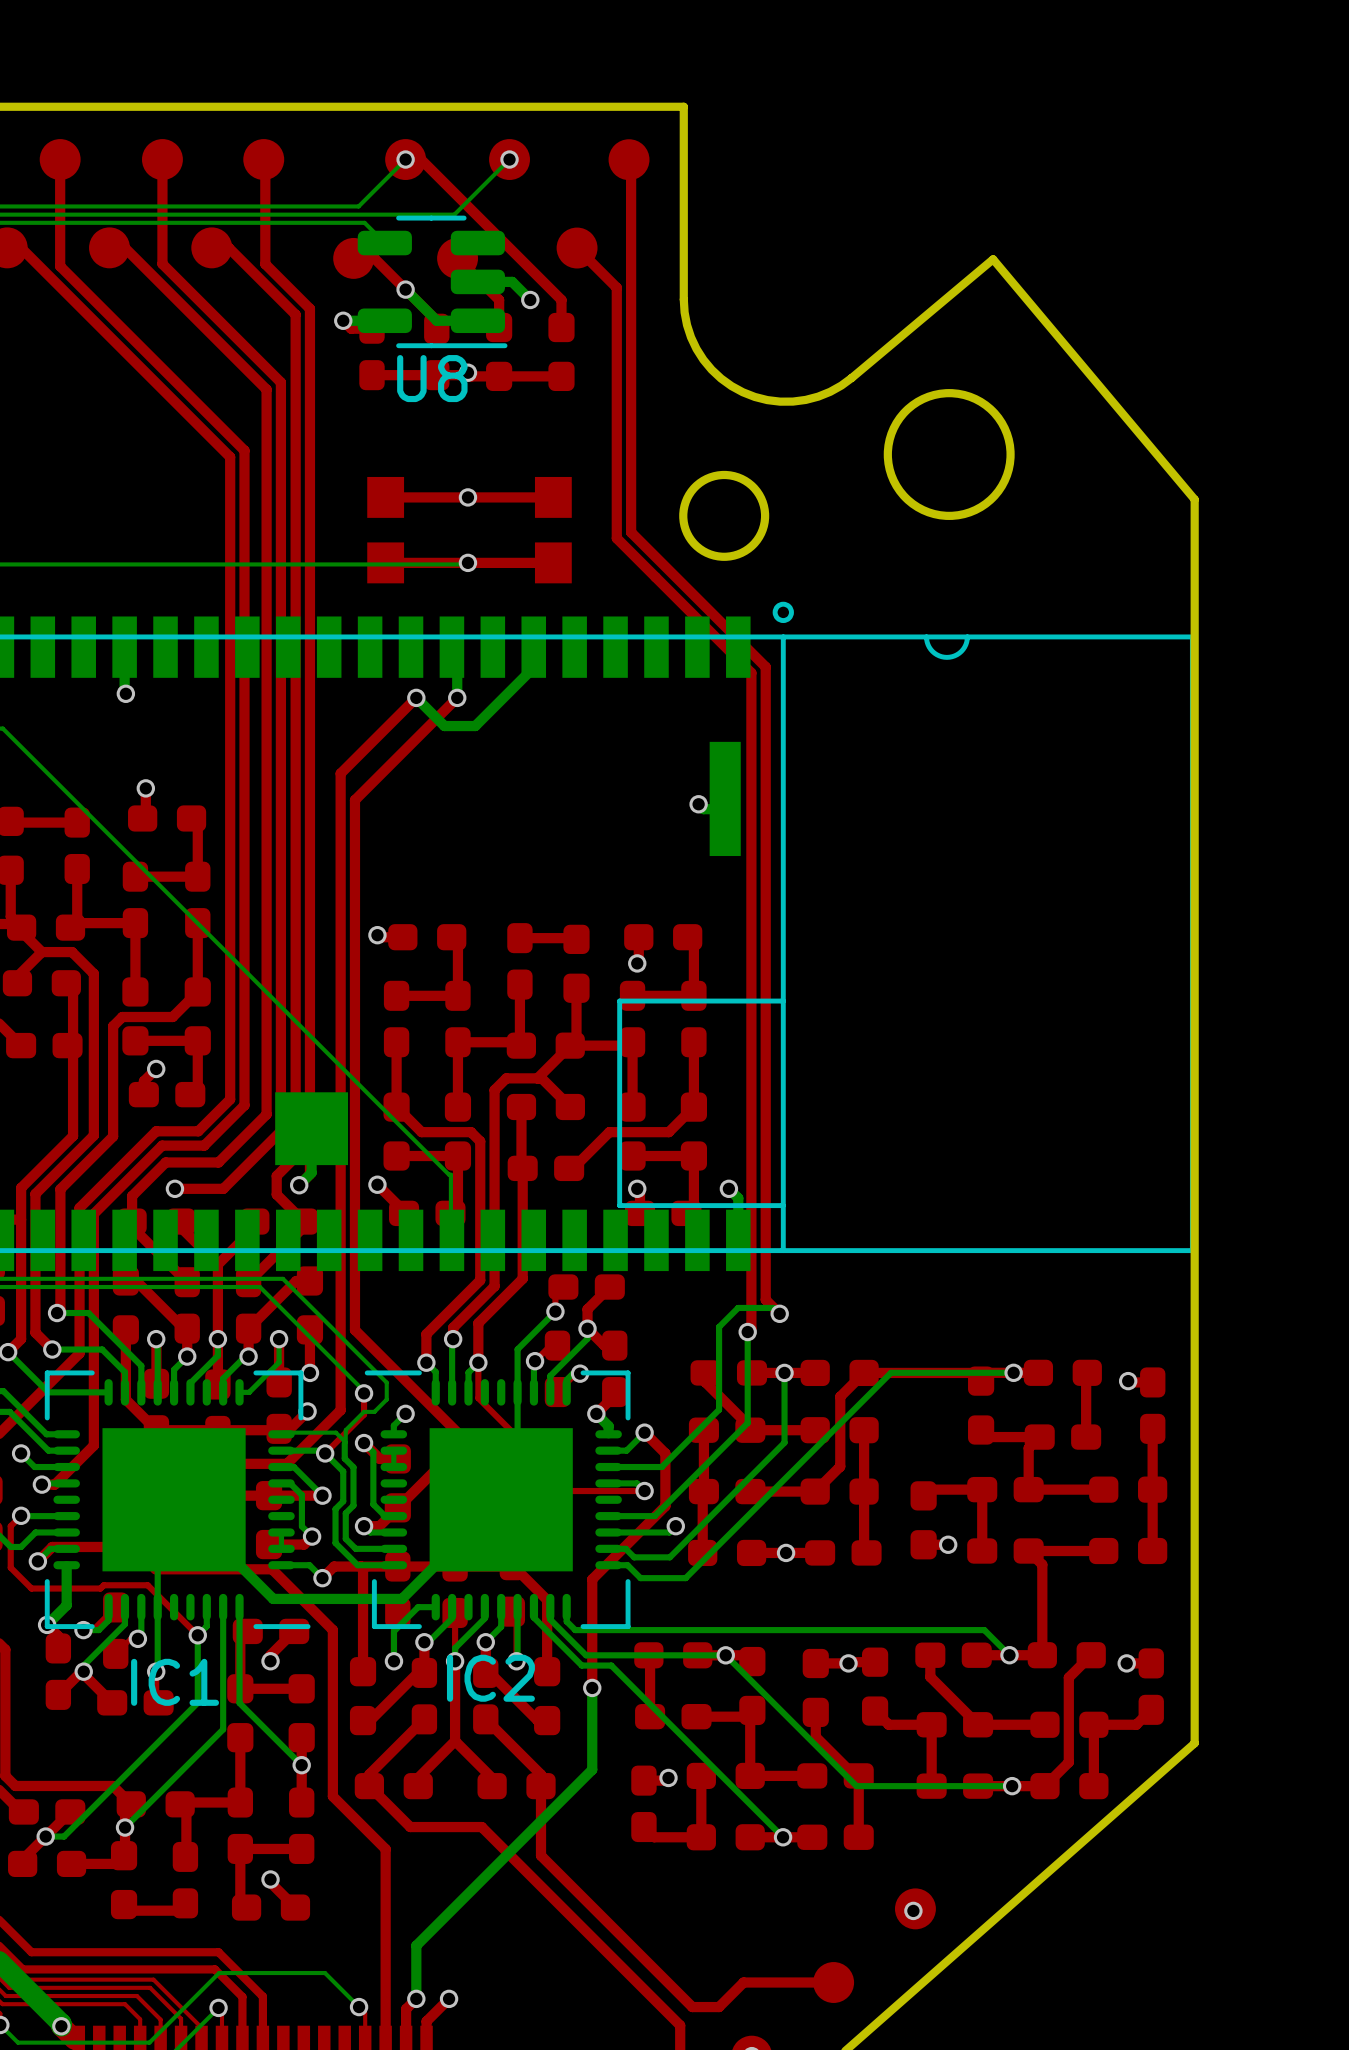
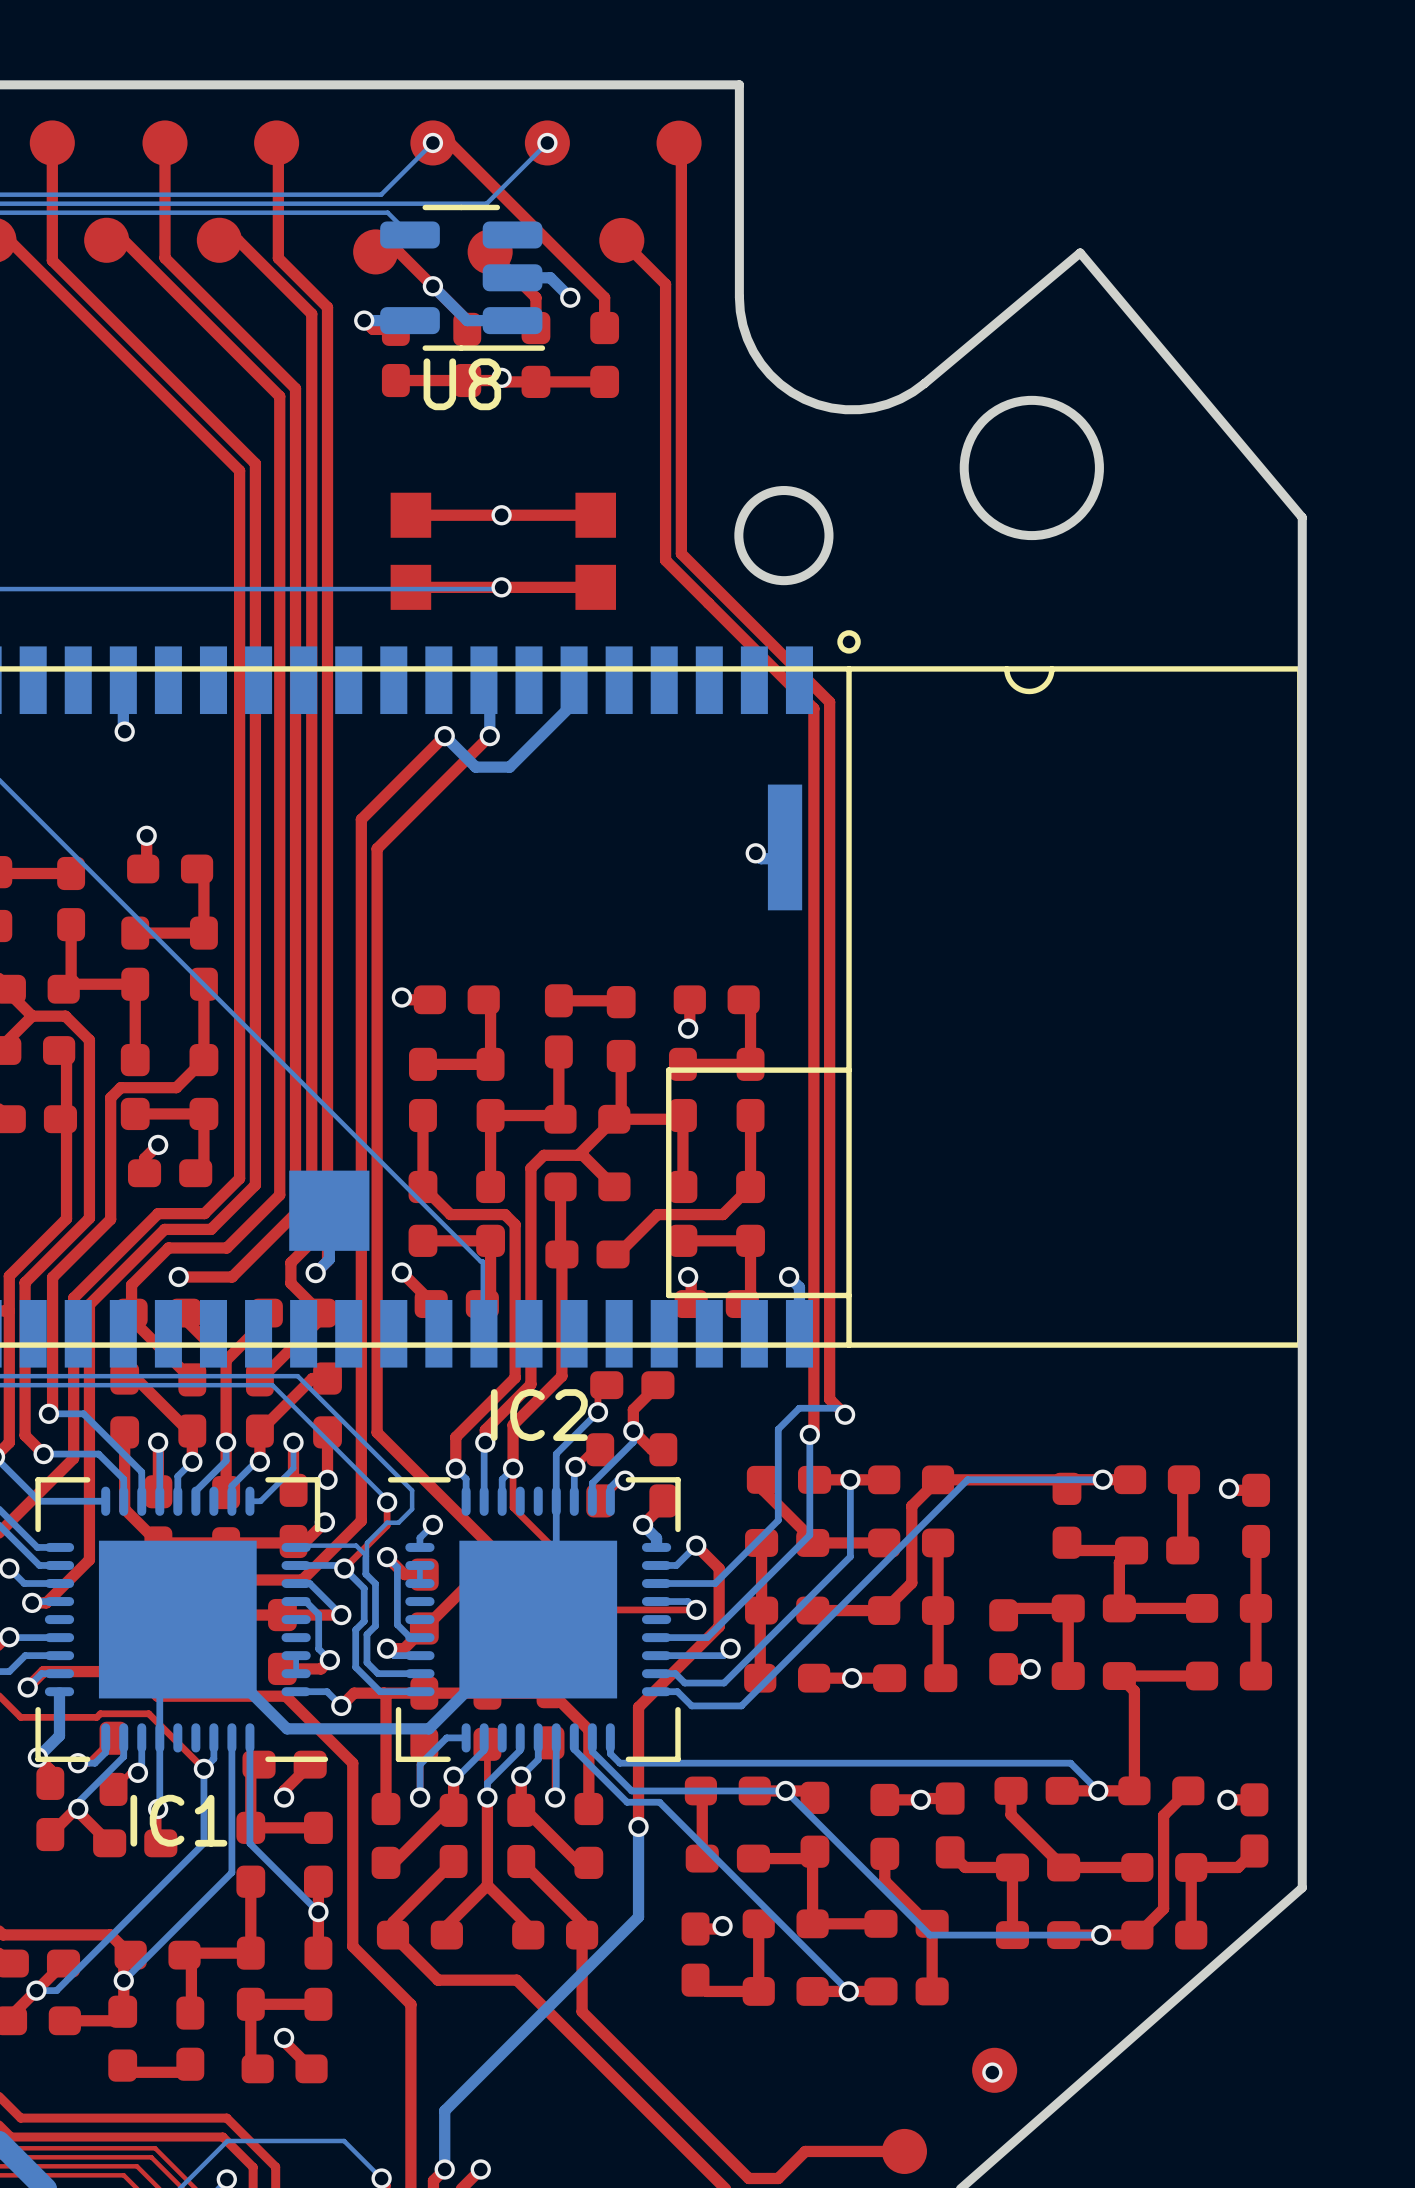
IC2 name position: IC2 (490, 1678) -> IC2 (539, 1415)

